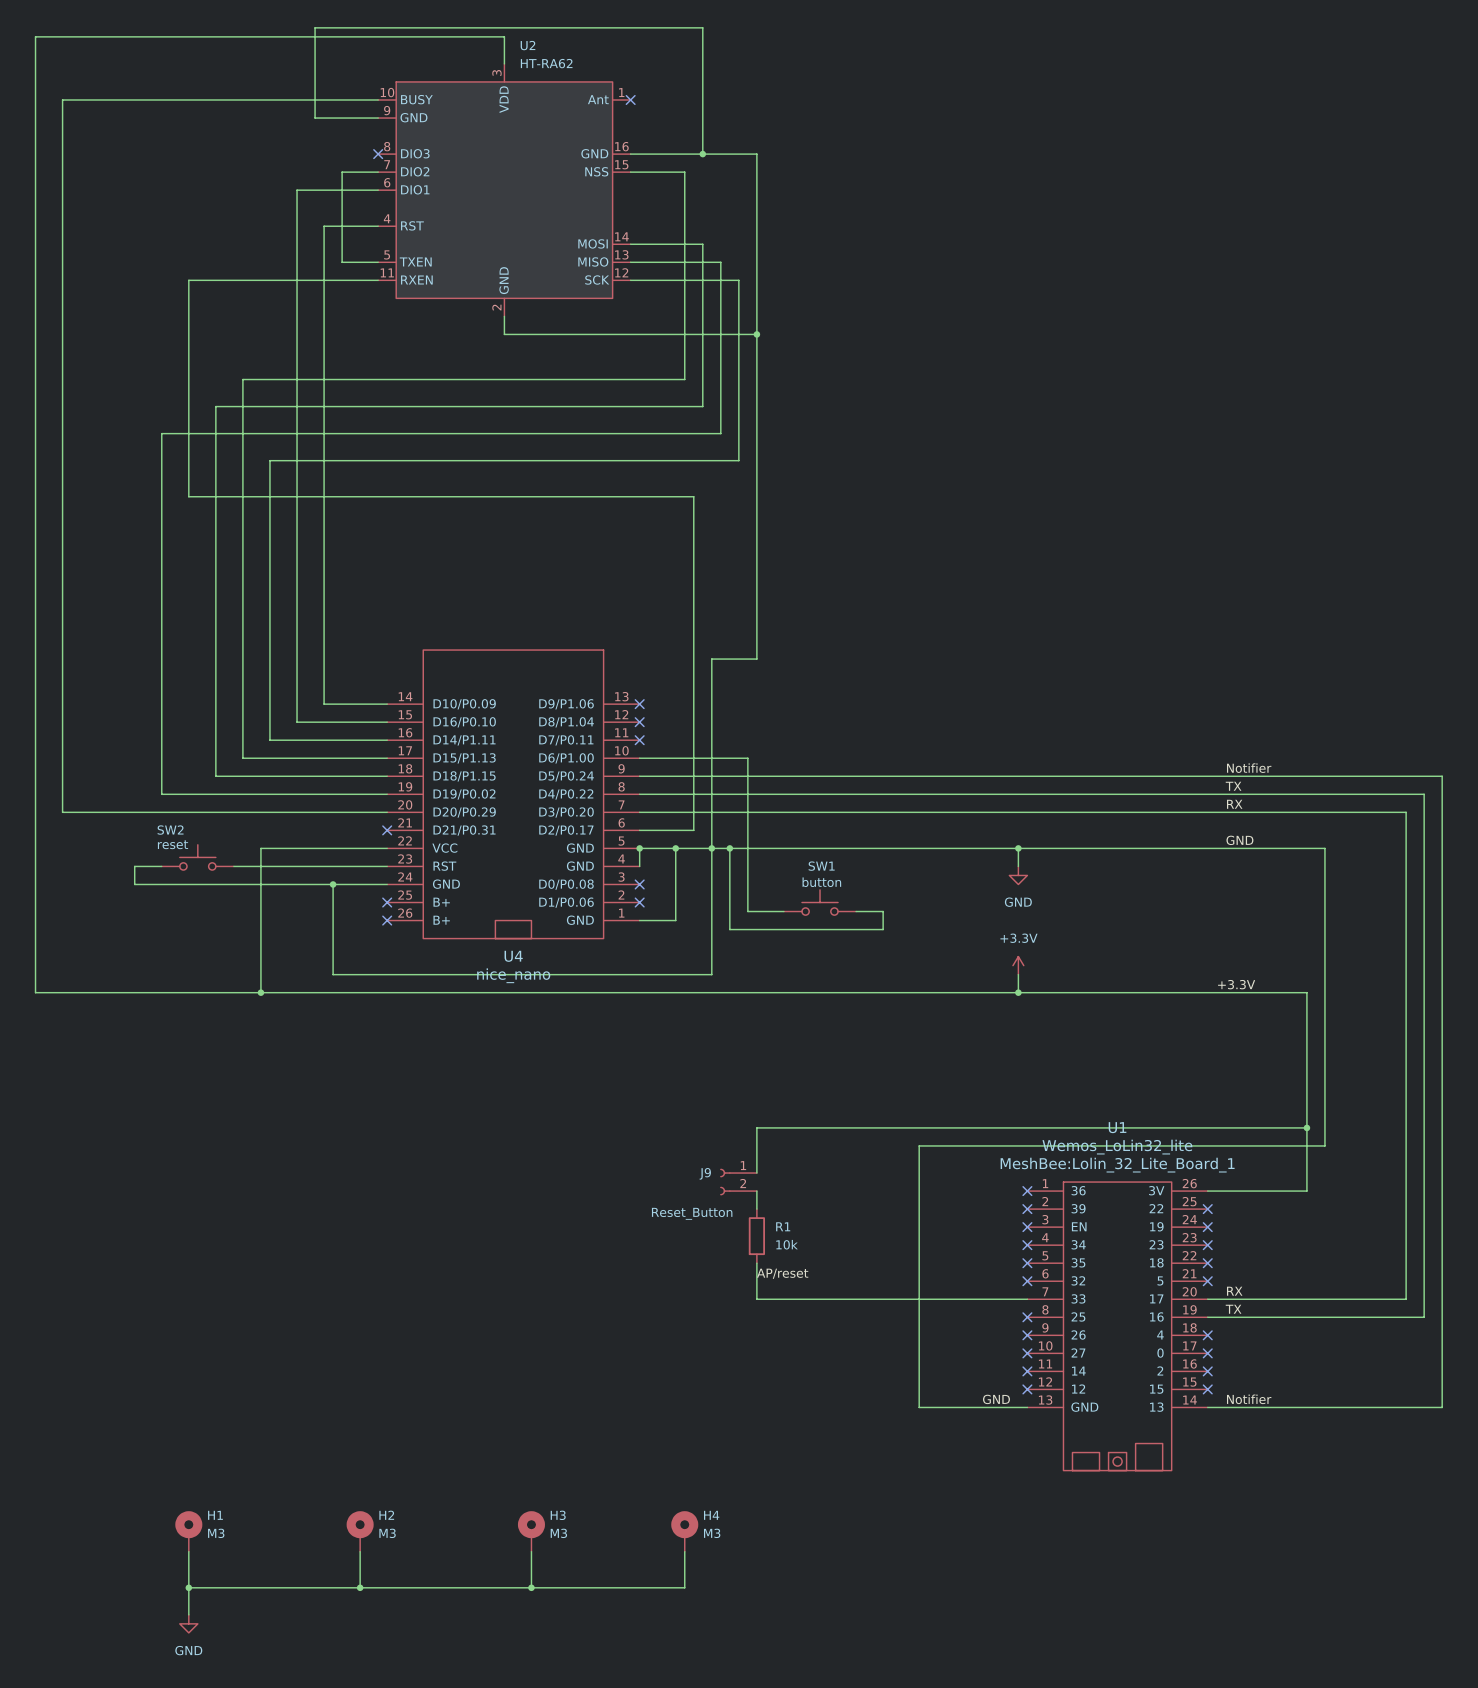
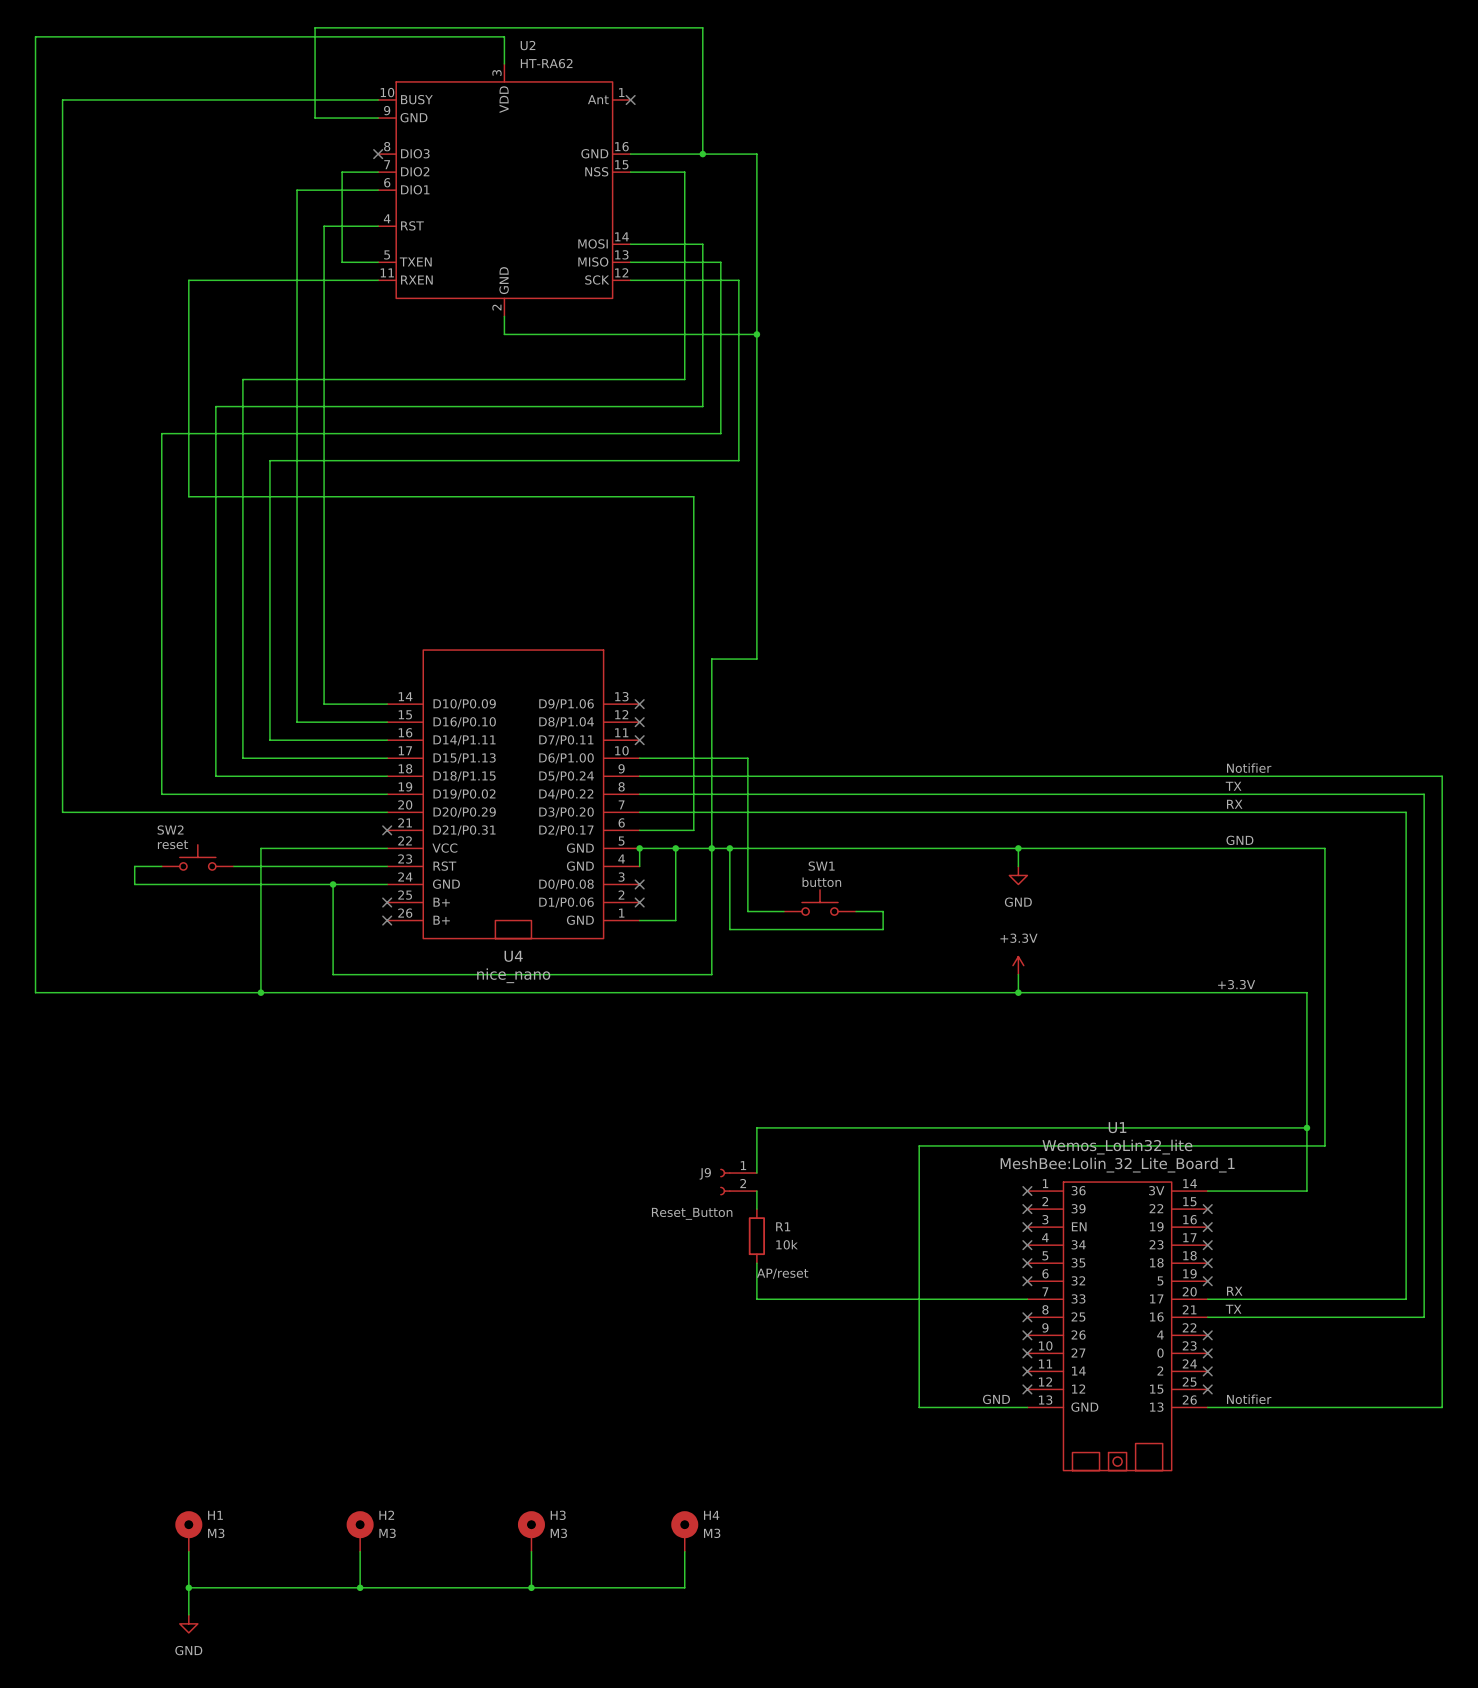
U1 symbol: [1027, 1182, 1208, 1471] -> [1027, 1182, 1208, 1471]

